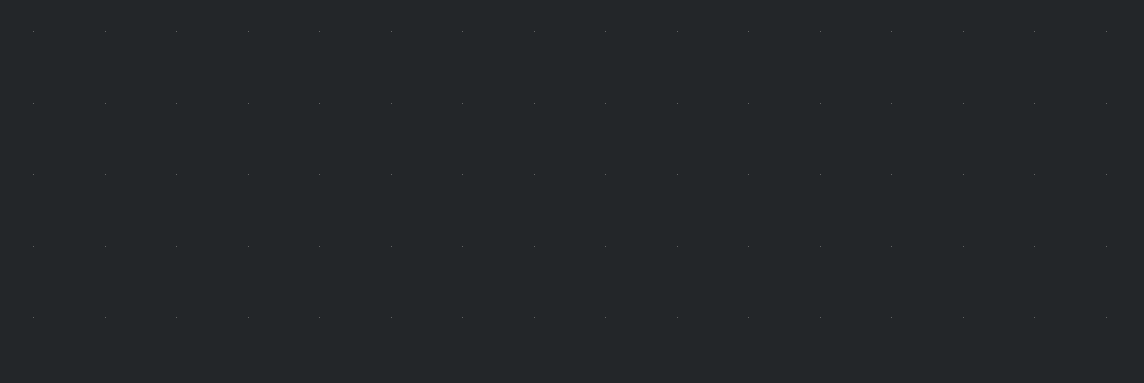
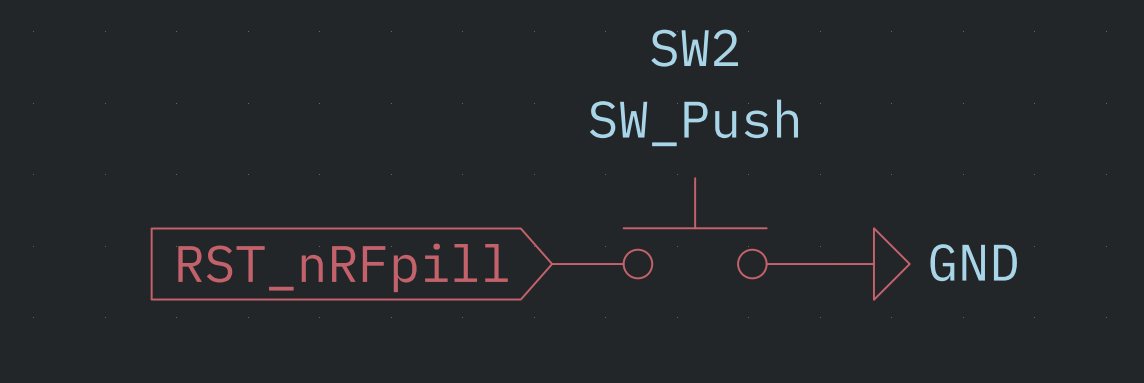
SW2: none -> SW_Push (695, 228)
power symbol: none -> GND (873, 264)
global label: none -> RST_nRFpill (343, 267)

